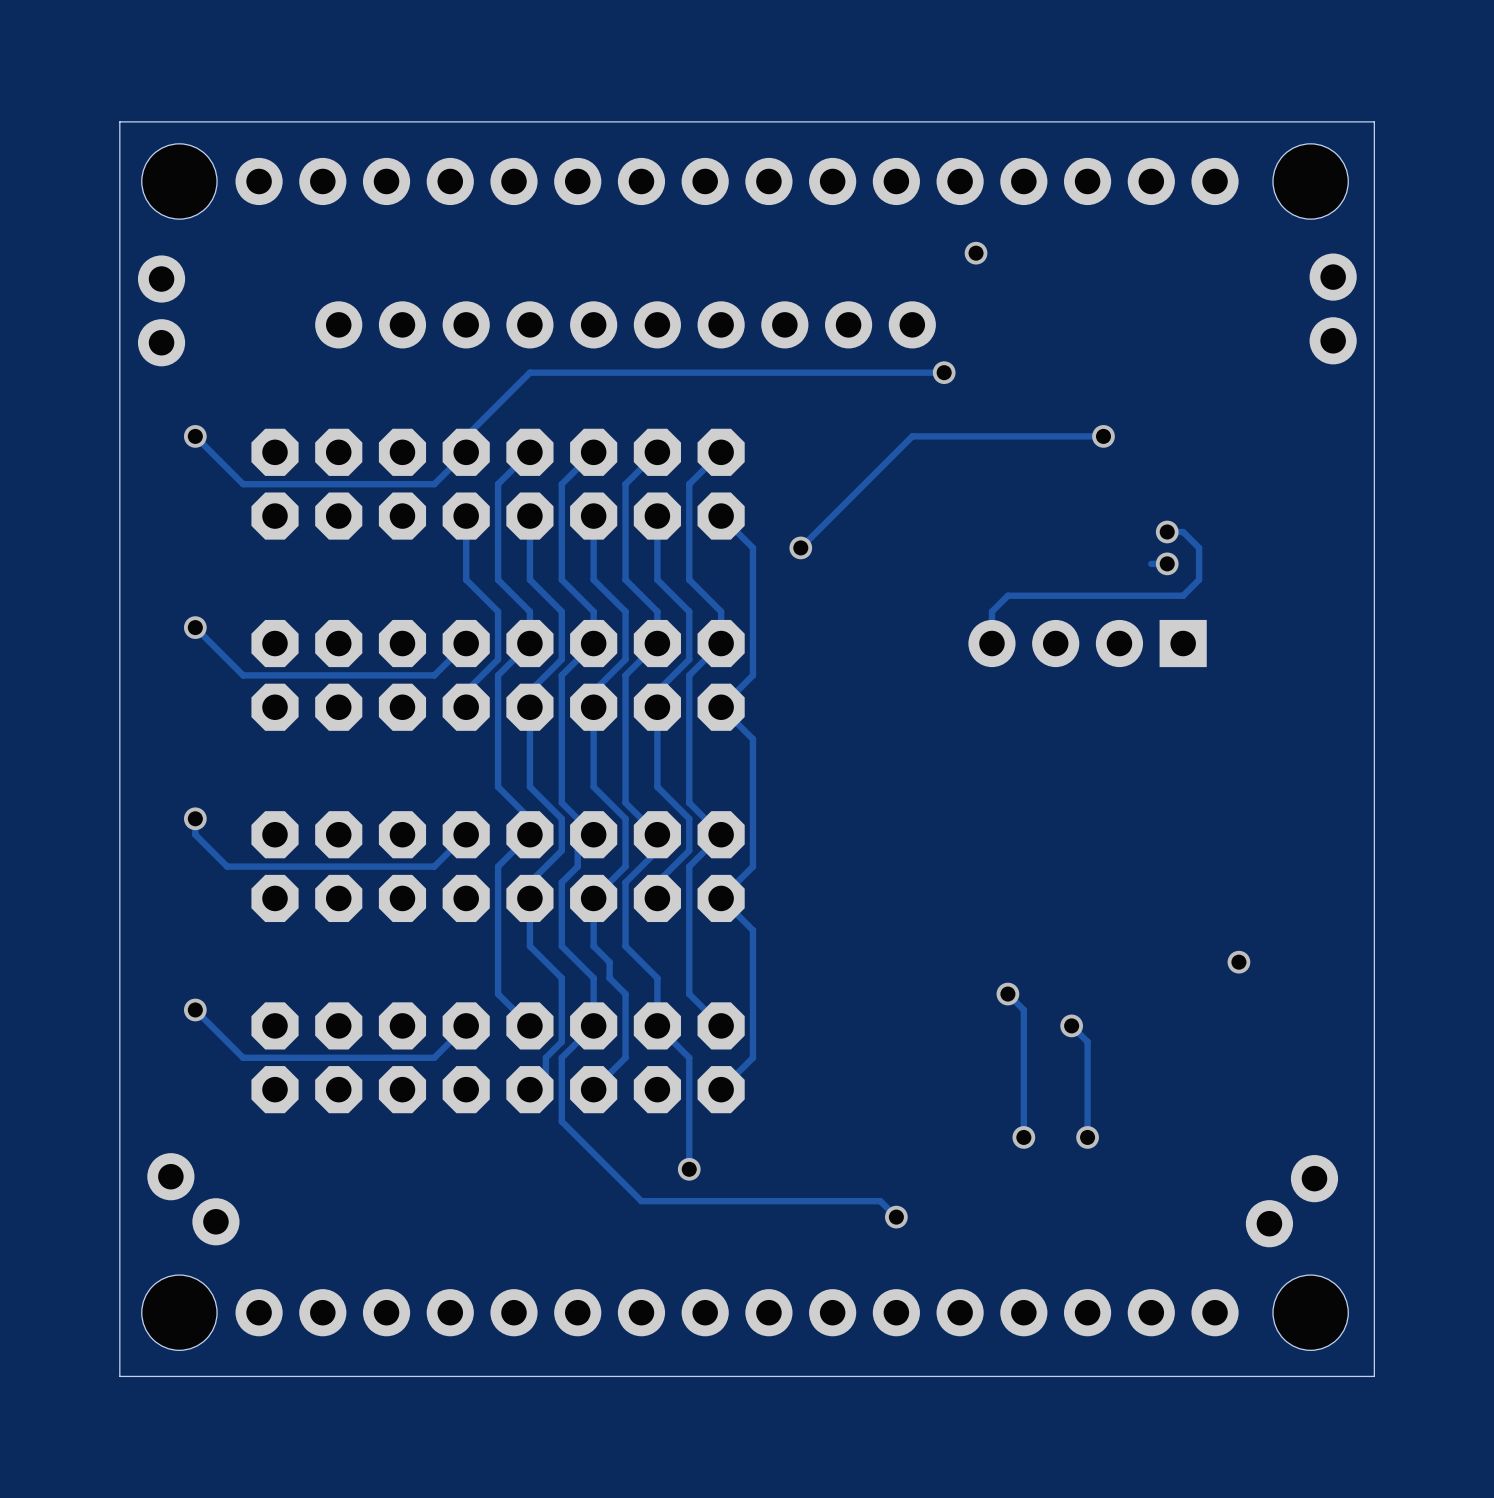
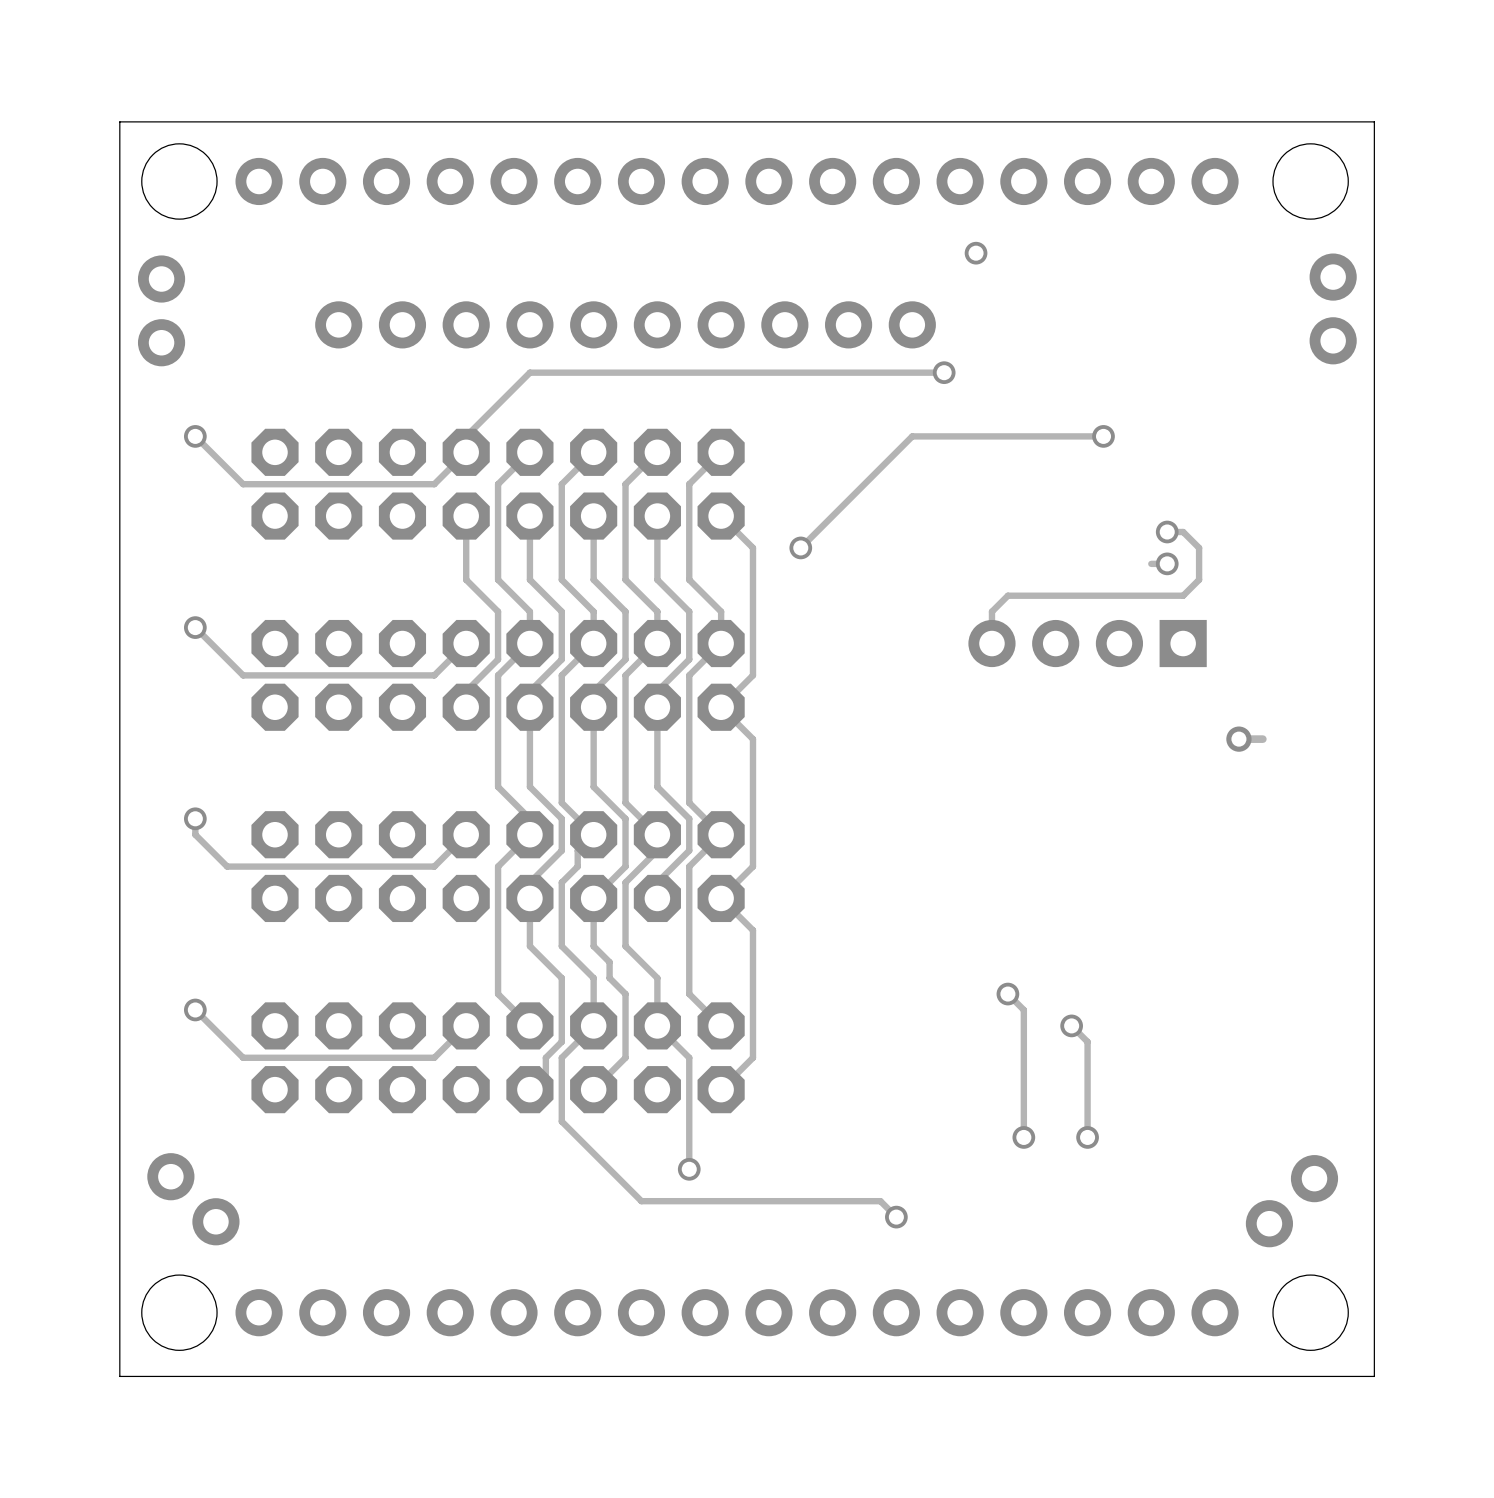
via: none -> (1238, 739)
track: none -> (1262, 739) (1238, 739)
via: (1238, 962) -> none

